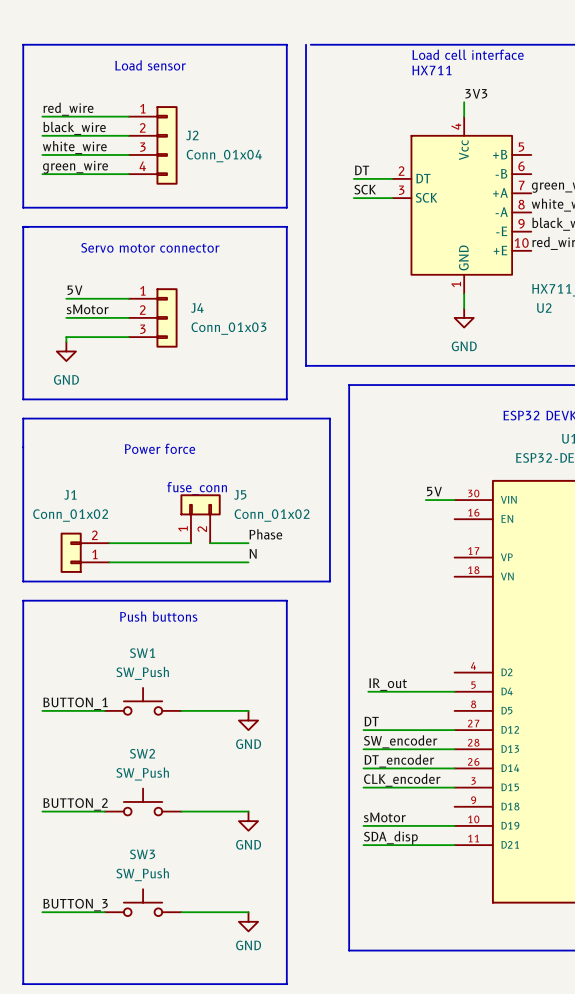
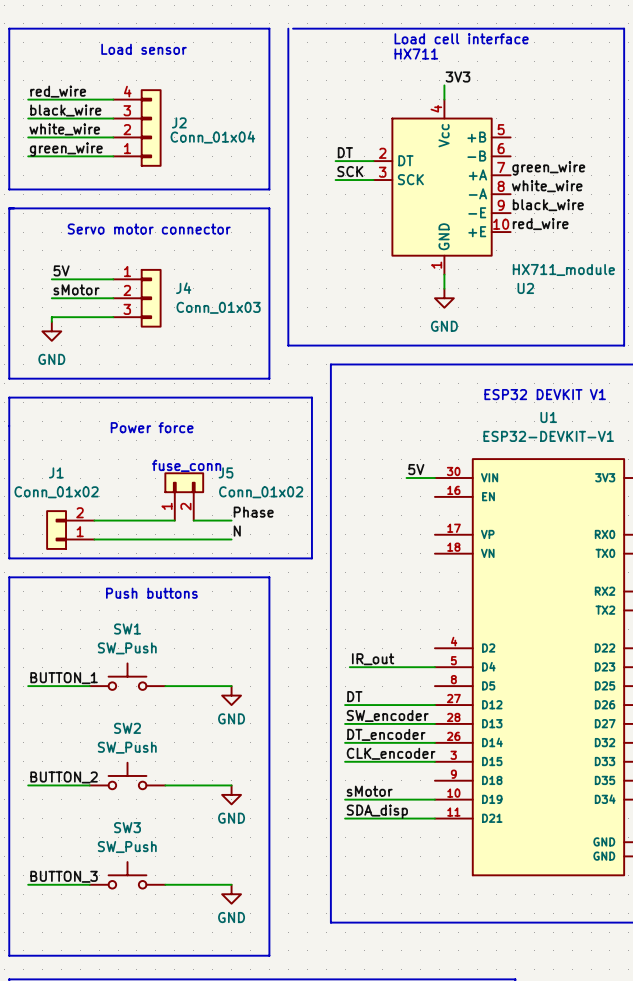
J2 flip: as is (167, 145) -> up-down (151, 127)

